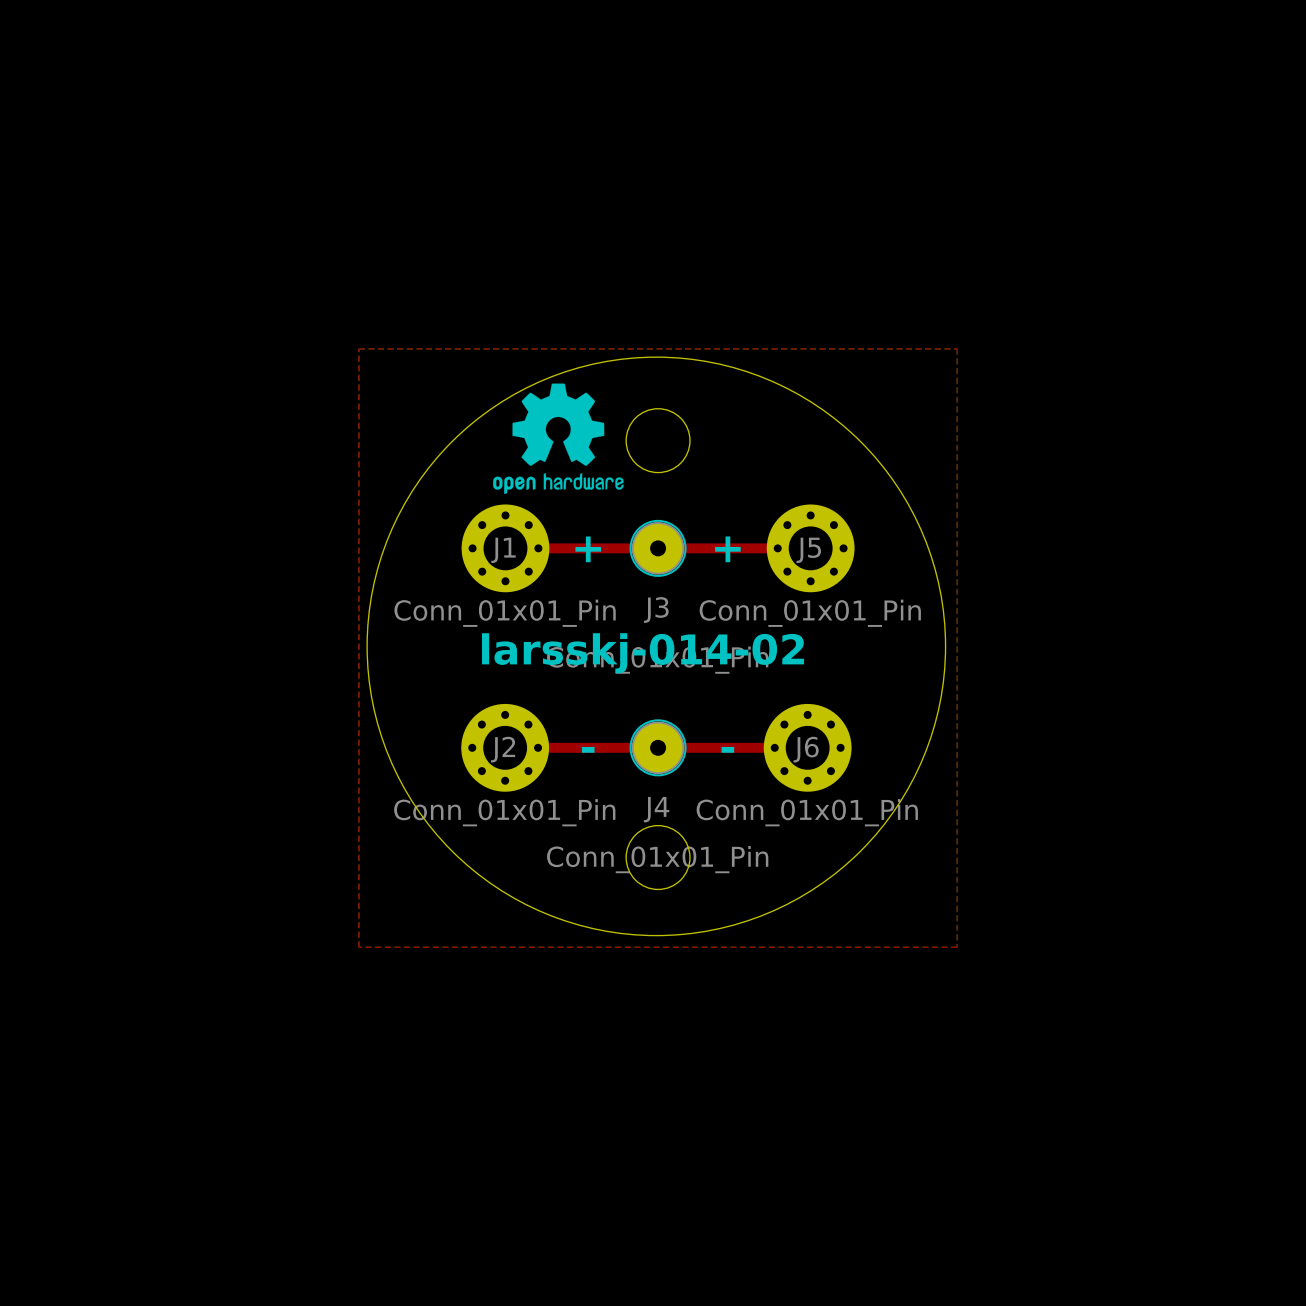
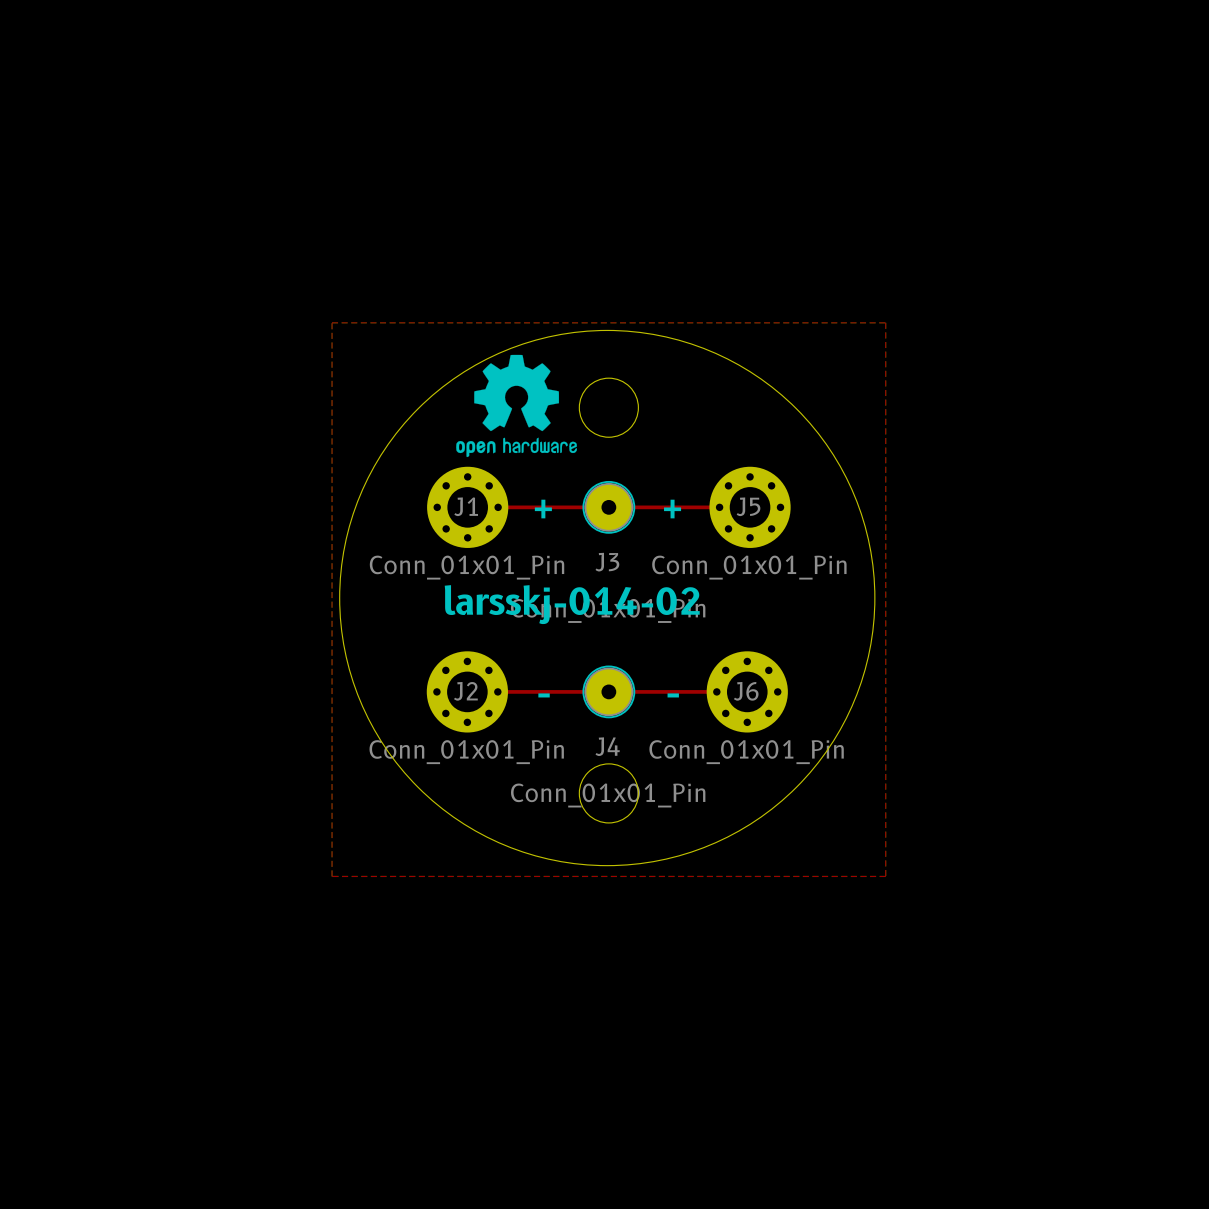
top track width: thick (538, 548) (810, 548) -> thin (498, 507) (750, 507)
top track width: thick (505, 747) (807, 747) -> thin (467, 691) (747, 691)

